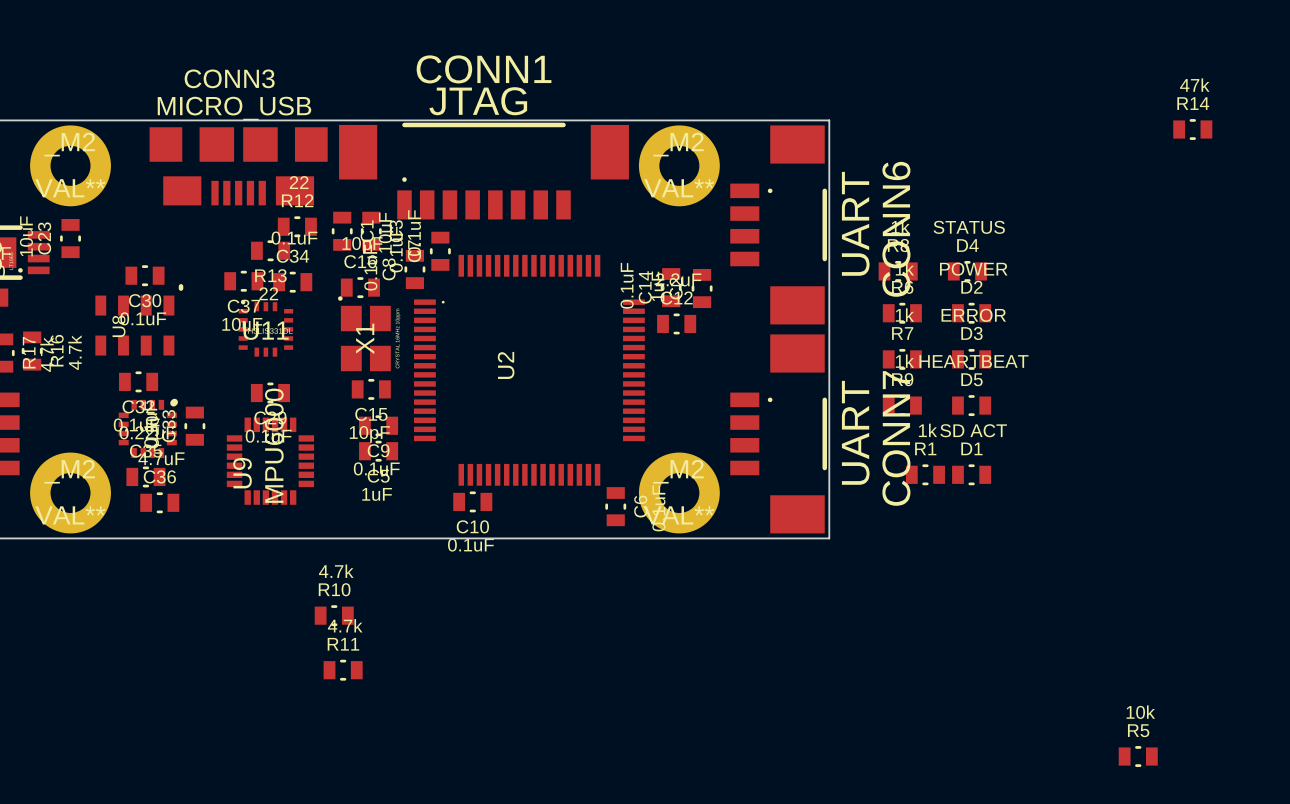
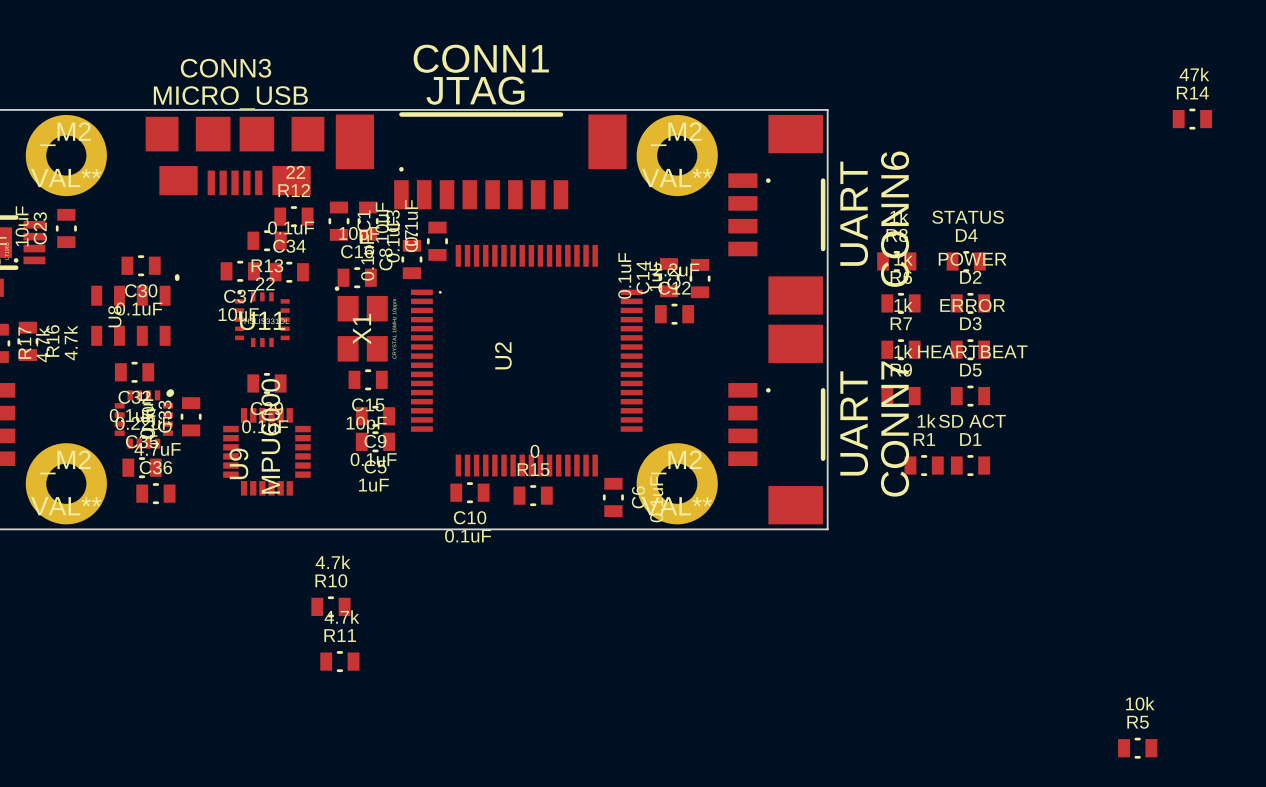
R15: none -> 0 (533, 495)

